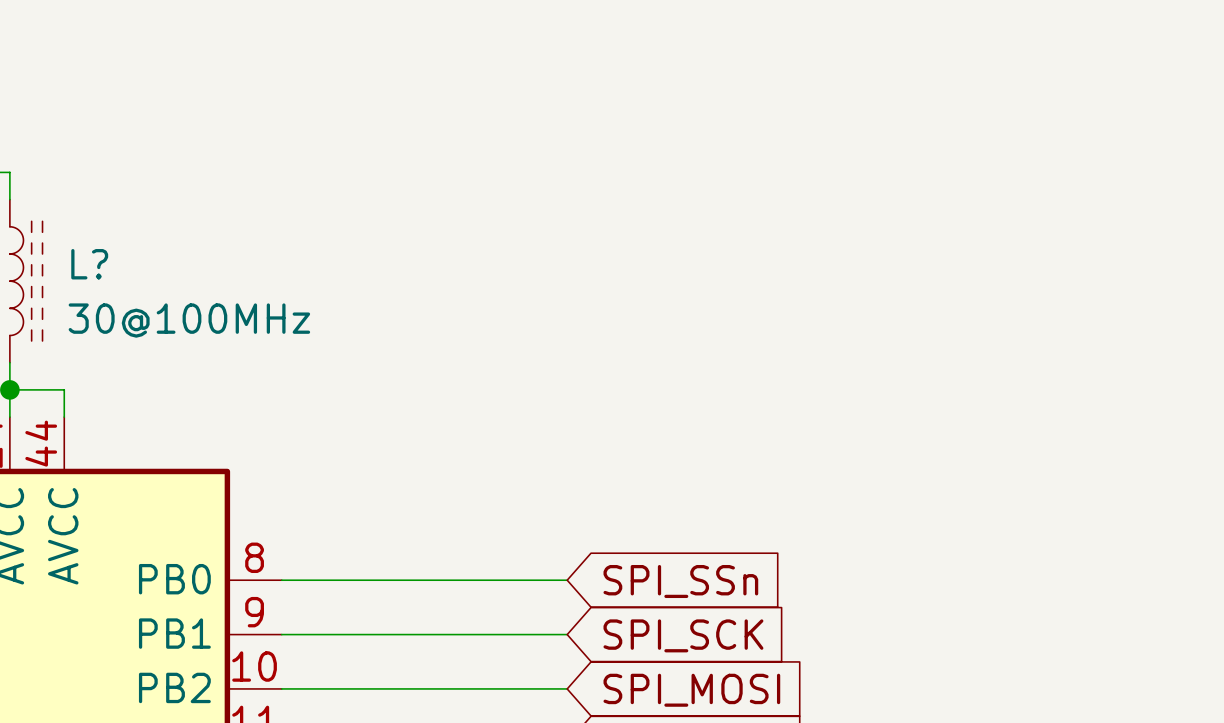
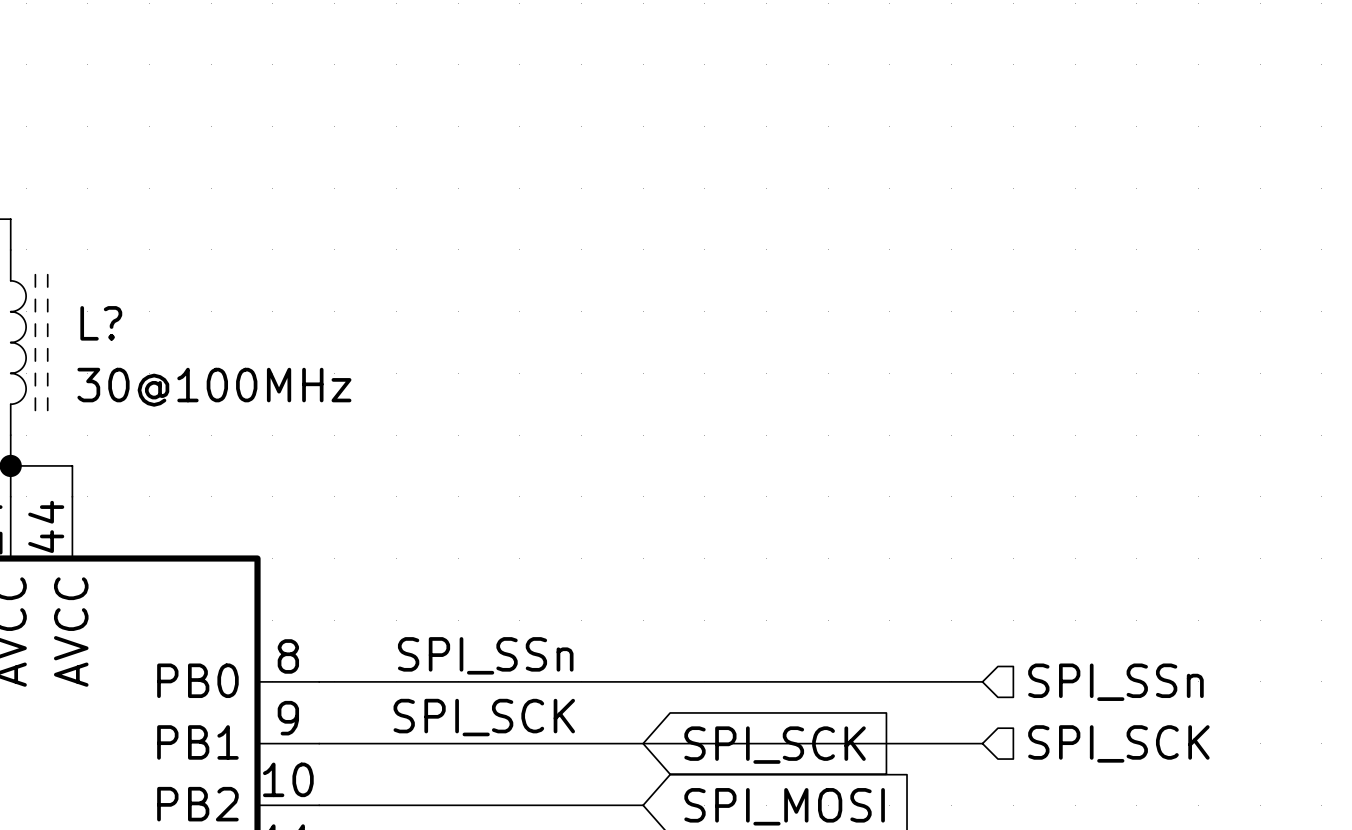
label: none -> SPI_SSn (485, 655)
wire: none -> (643, 681) (982, 681)
hierarchical label: none -> SPI_SSn (1115, 682)
global label: SPI_SSn (680, 581) -> none
label: none -> SPI_SCK (484, 717)
wire: none -> (643, 743) (982, 743)
hierarchical label: none -> SPI_SCK (1118, 743)

